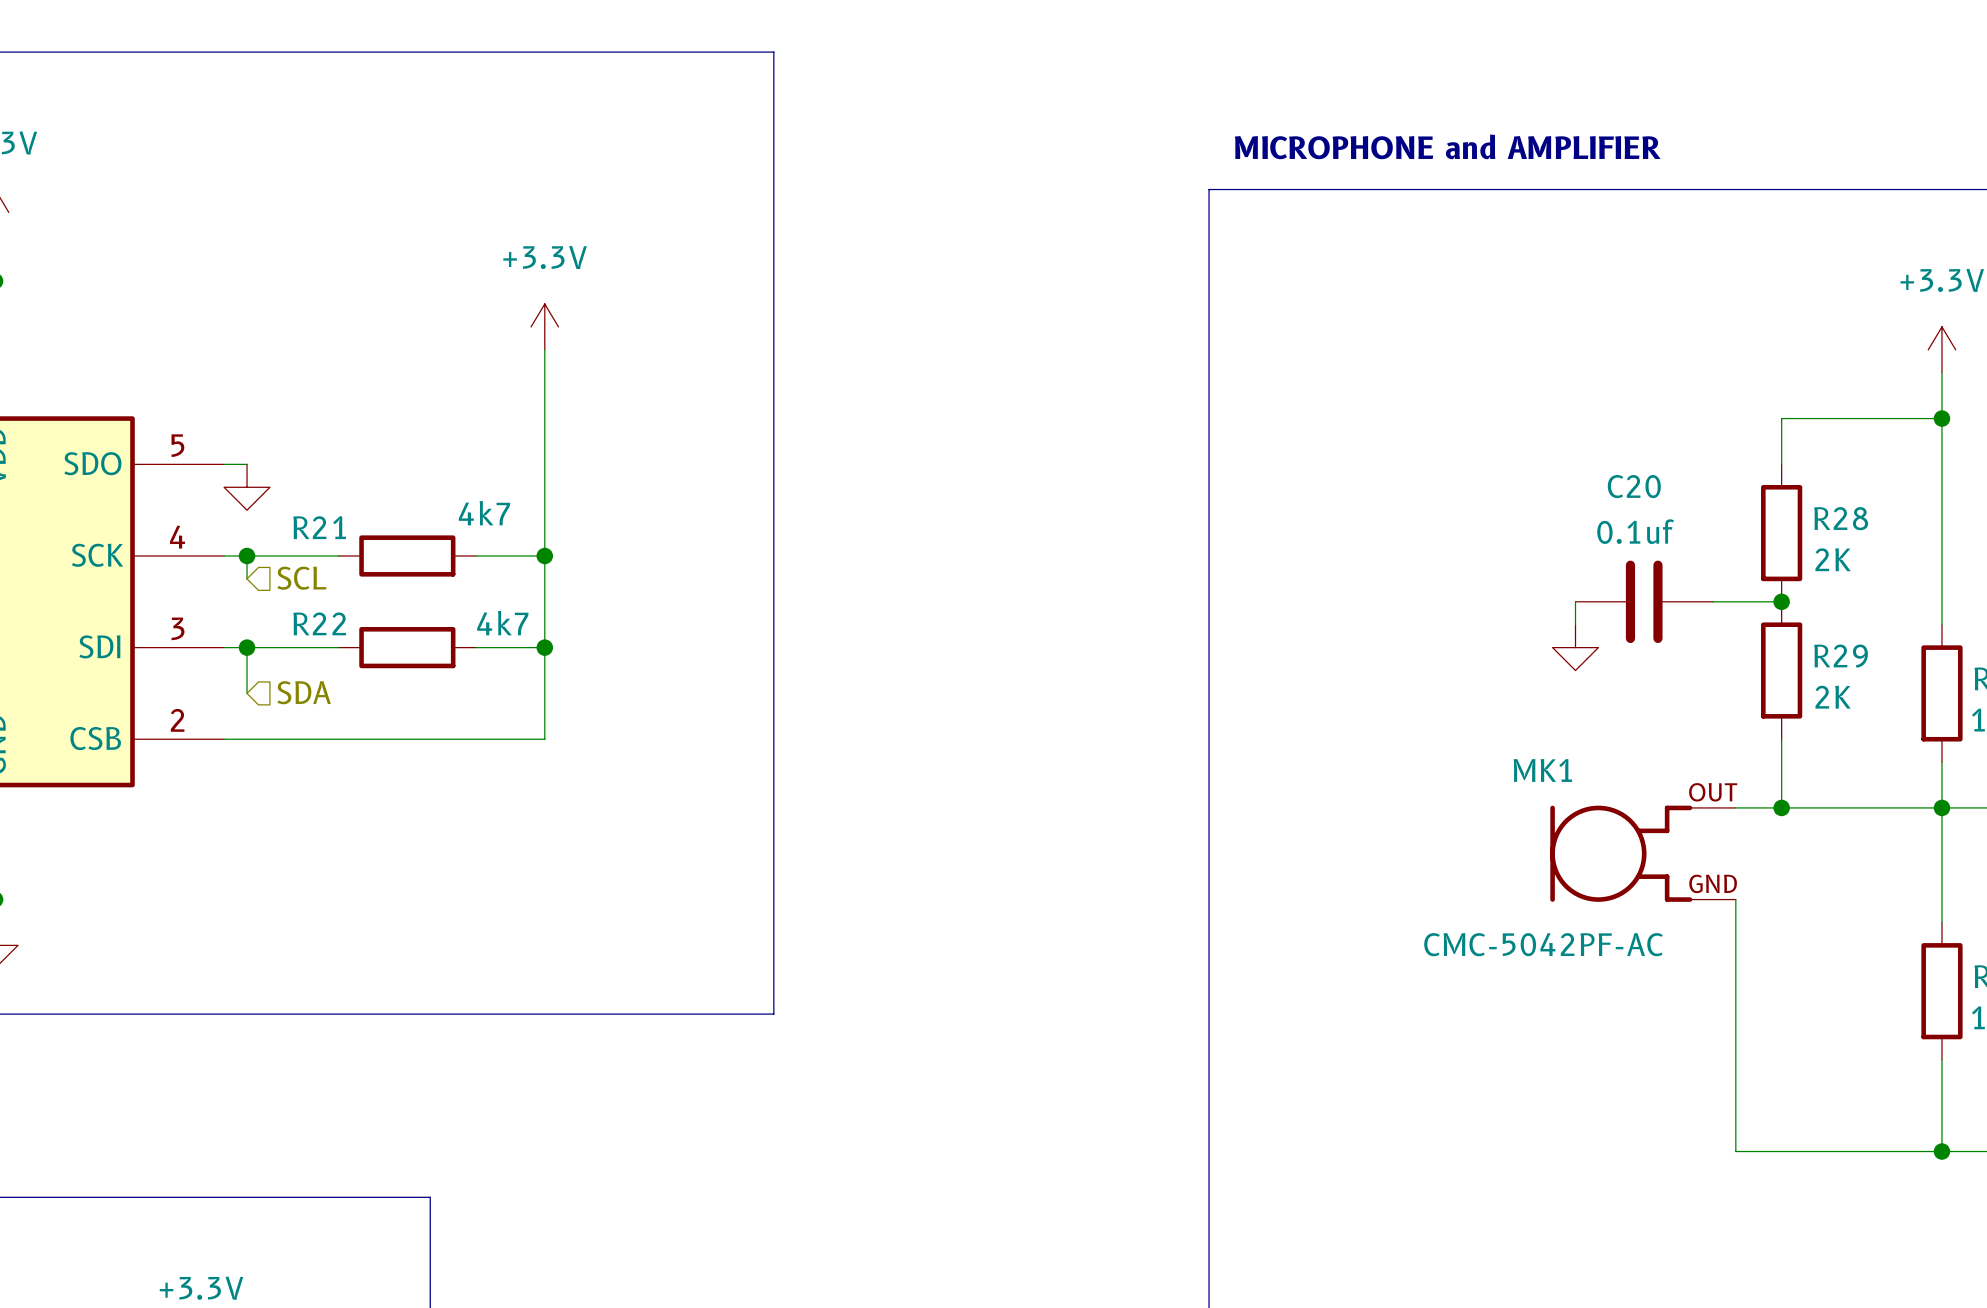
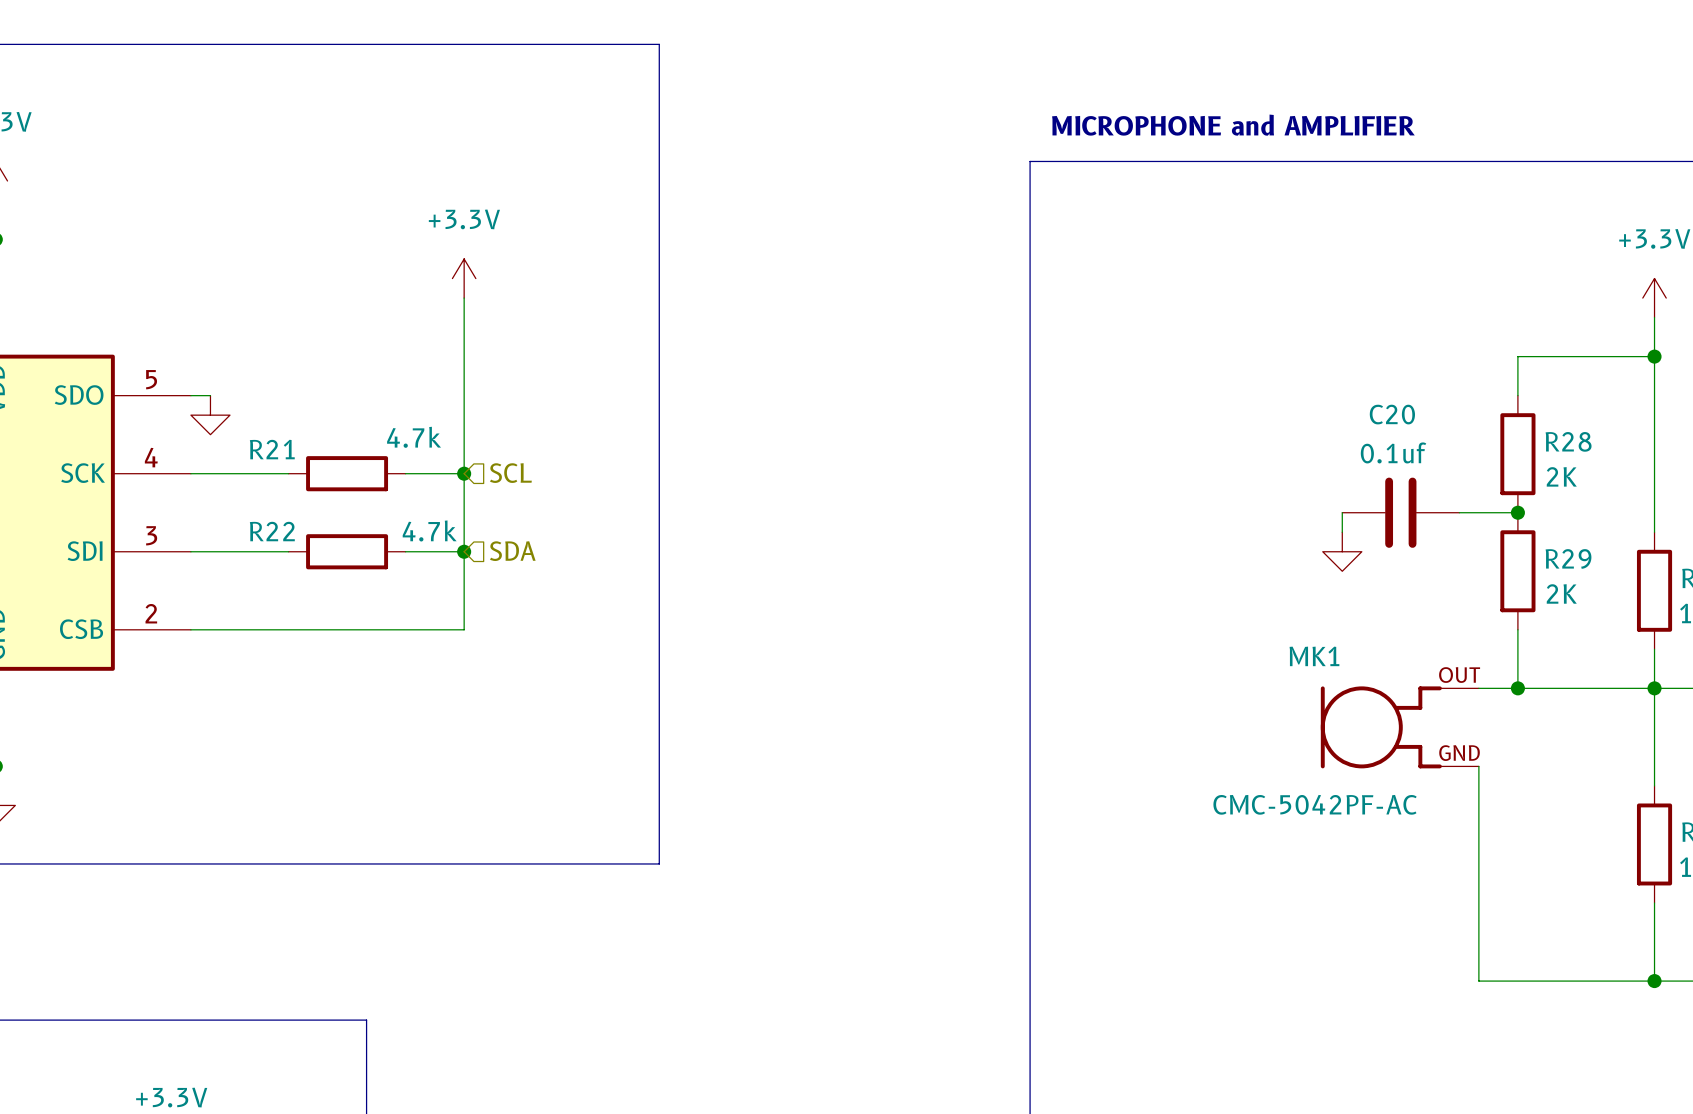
R21 value: 4k7 (484, 513) -> 4.7k (414, 437)
wire: (247, 556) (247, 578) -> none
junction: (247, 556) -> none
hierarchical label position: SCL (301, 578) -> SCL (510, 473)
R22 value: 4k7 (502, 623) -> 4.7k (429, 530)
wire: (247, 647) (247, 693) -> none
junction: (247, 647) -> none
hierarchical label position: SDA (304, 692) -> SDA (512, 551)

